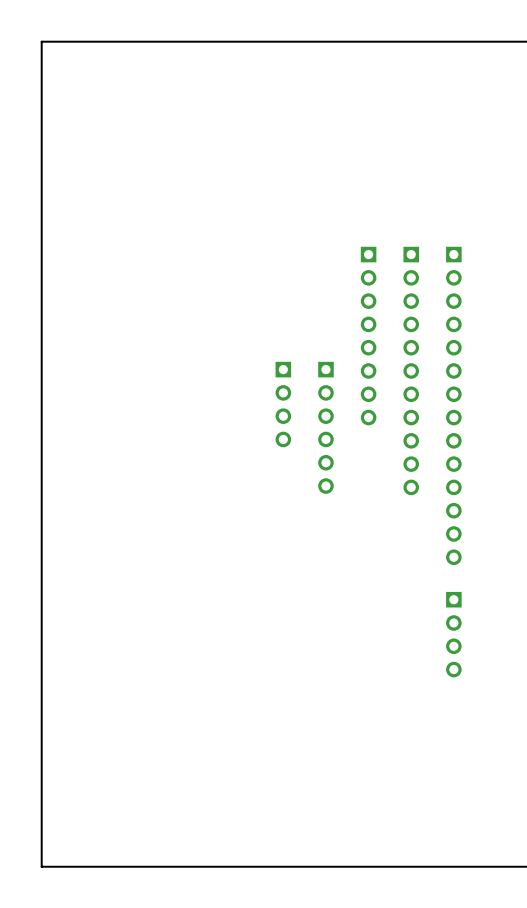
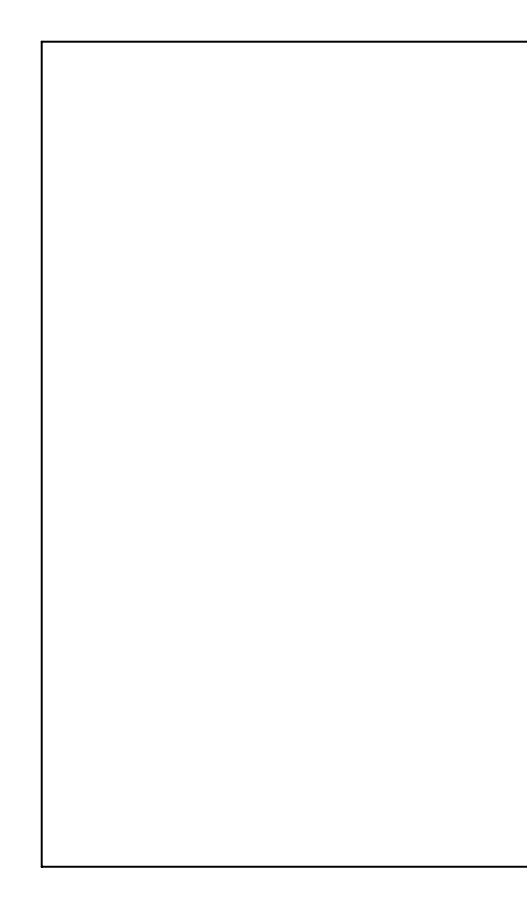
part: (368, 336) -> none
part: (411, 370) -> none
part: (283, 404) -> none
part: (453, 405) -> none
part: (325, 427) -> none
part: (453, 634) -> none

